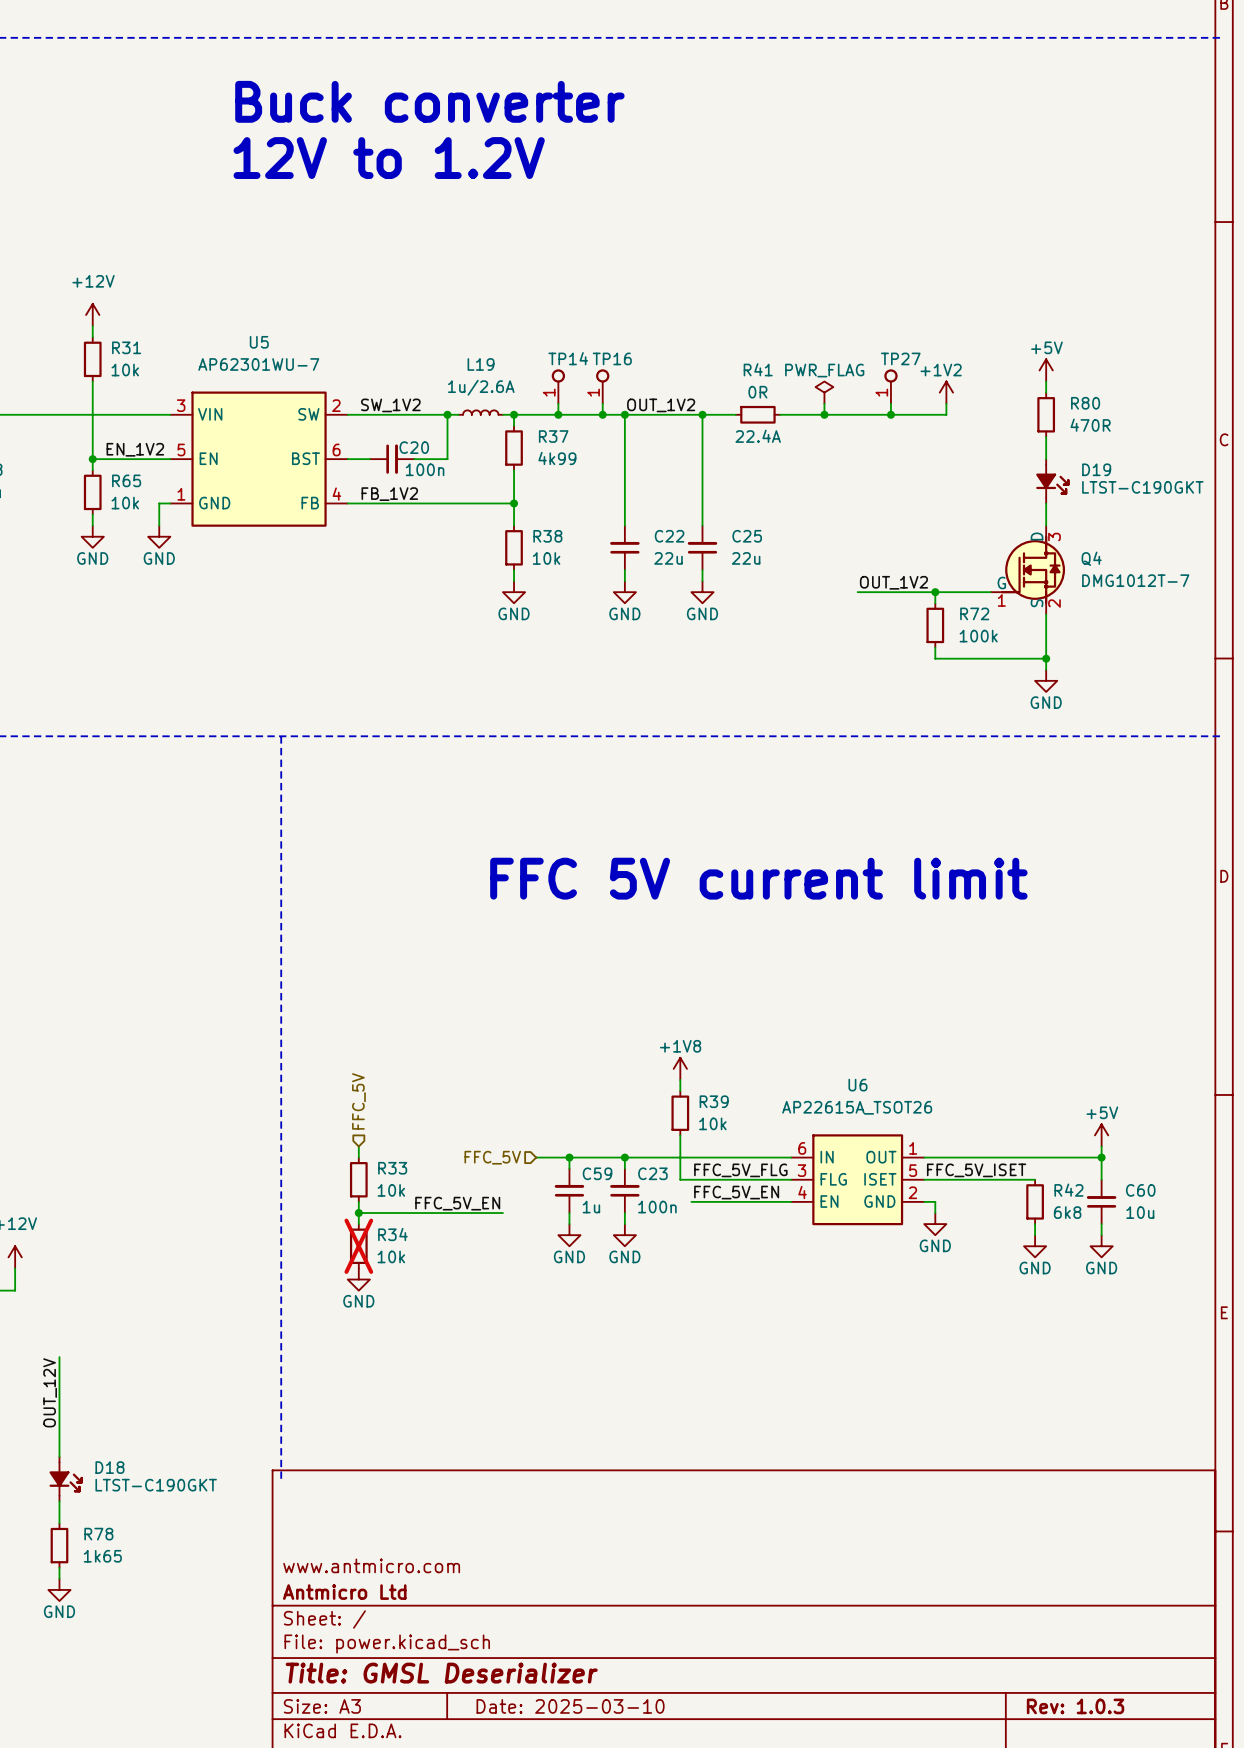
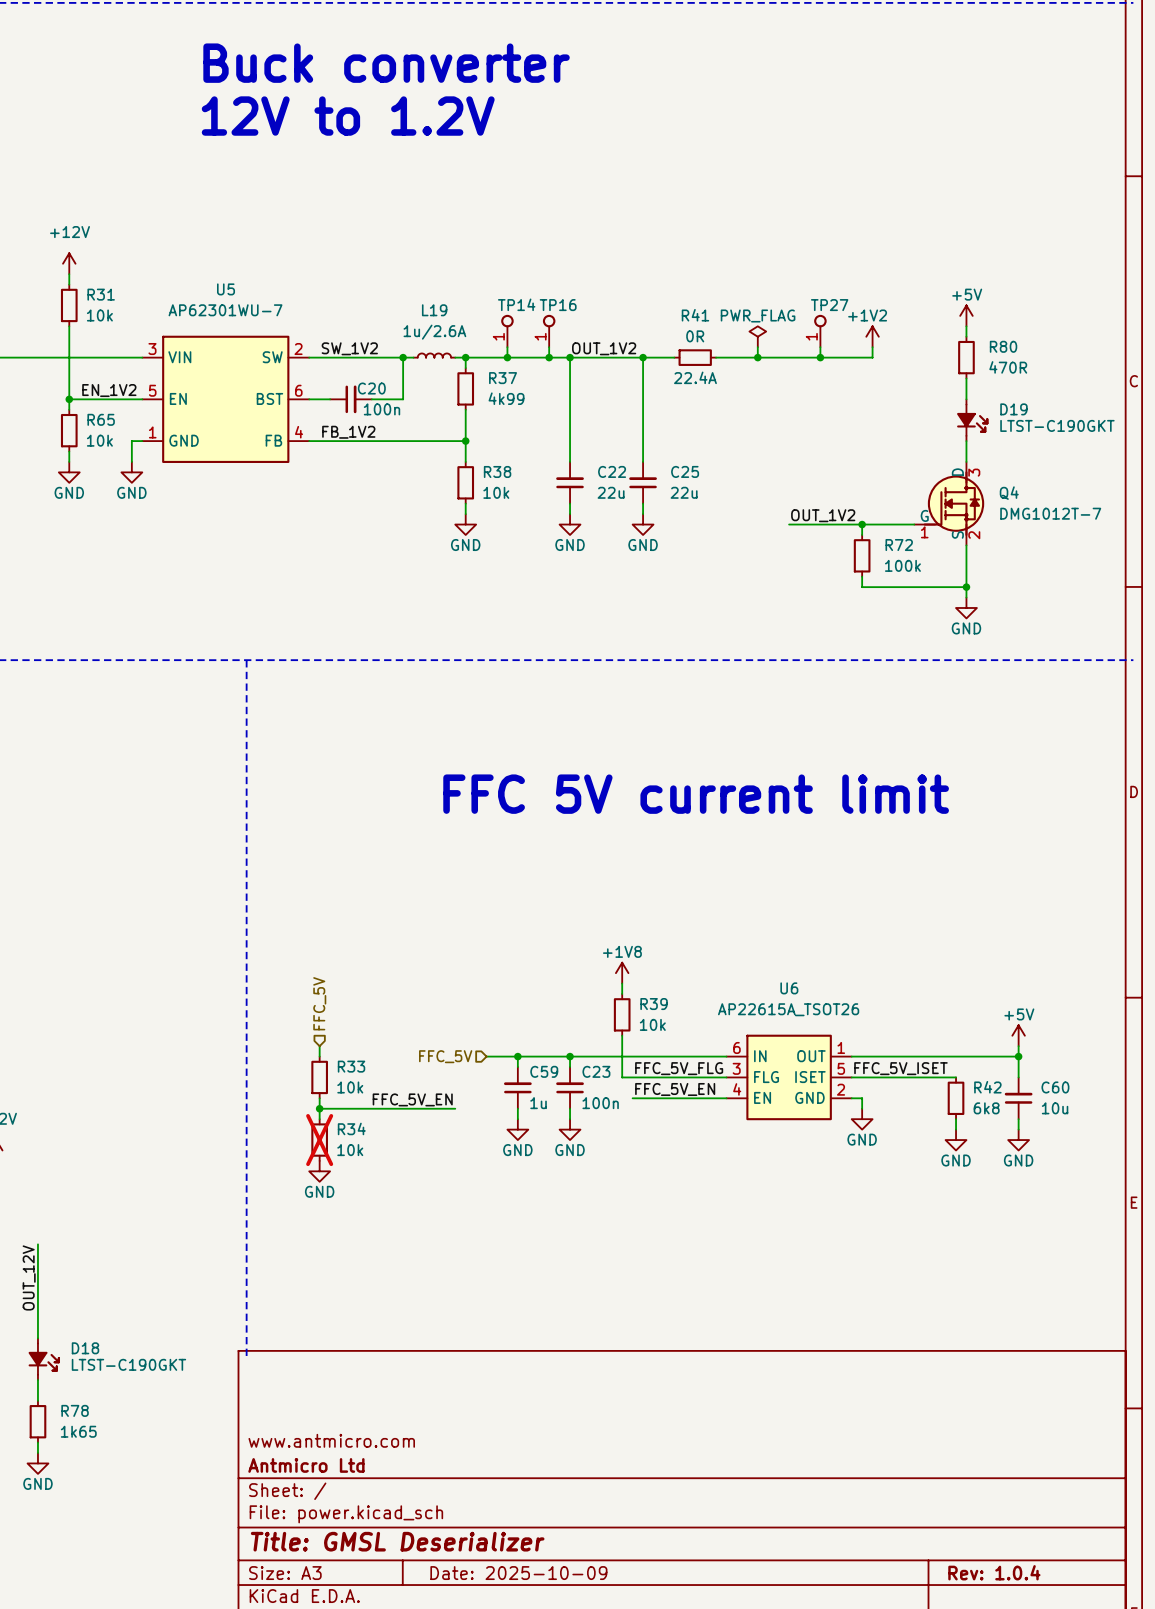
title block: Date: 2025-03-10 (570, 1706) -> Date: 2025-10-09 (518, 1573)
title block: Rev: 1.0.3 (1075, 1706) -> Rev: 1.0.4 (994, 1572)

